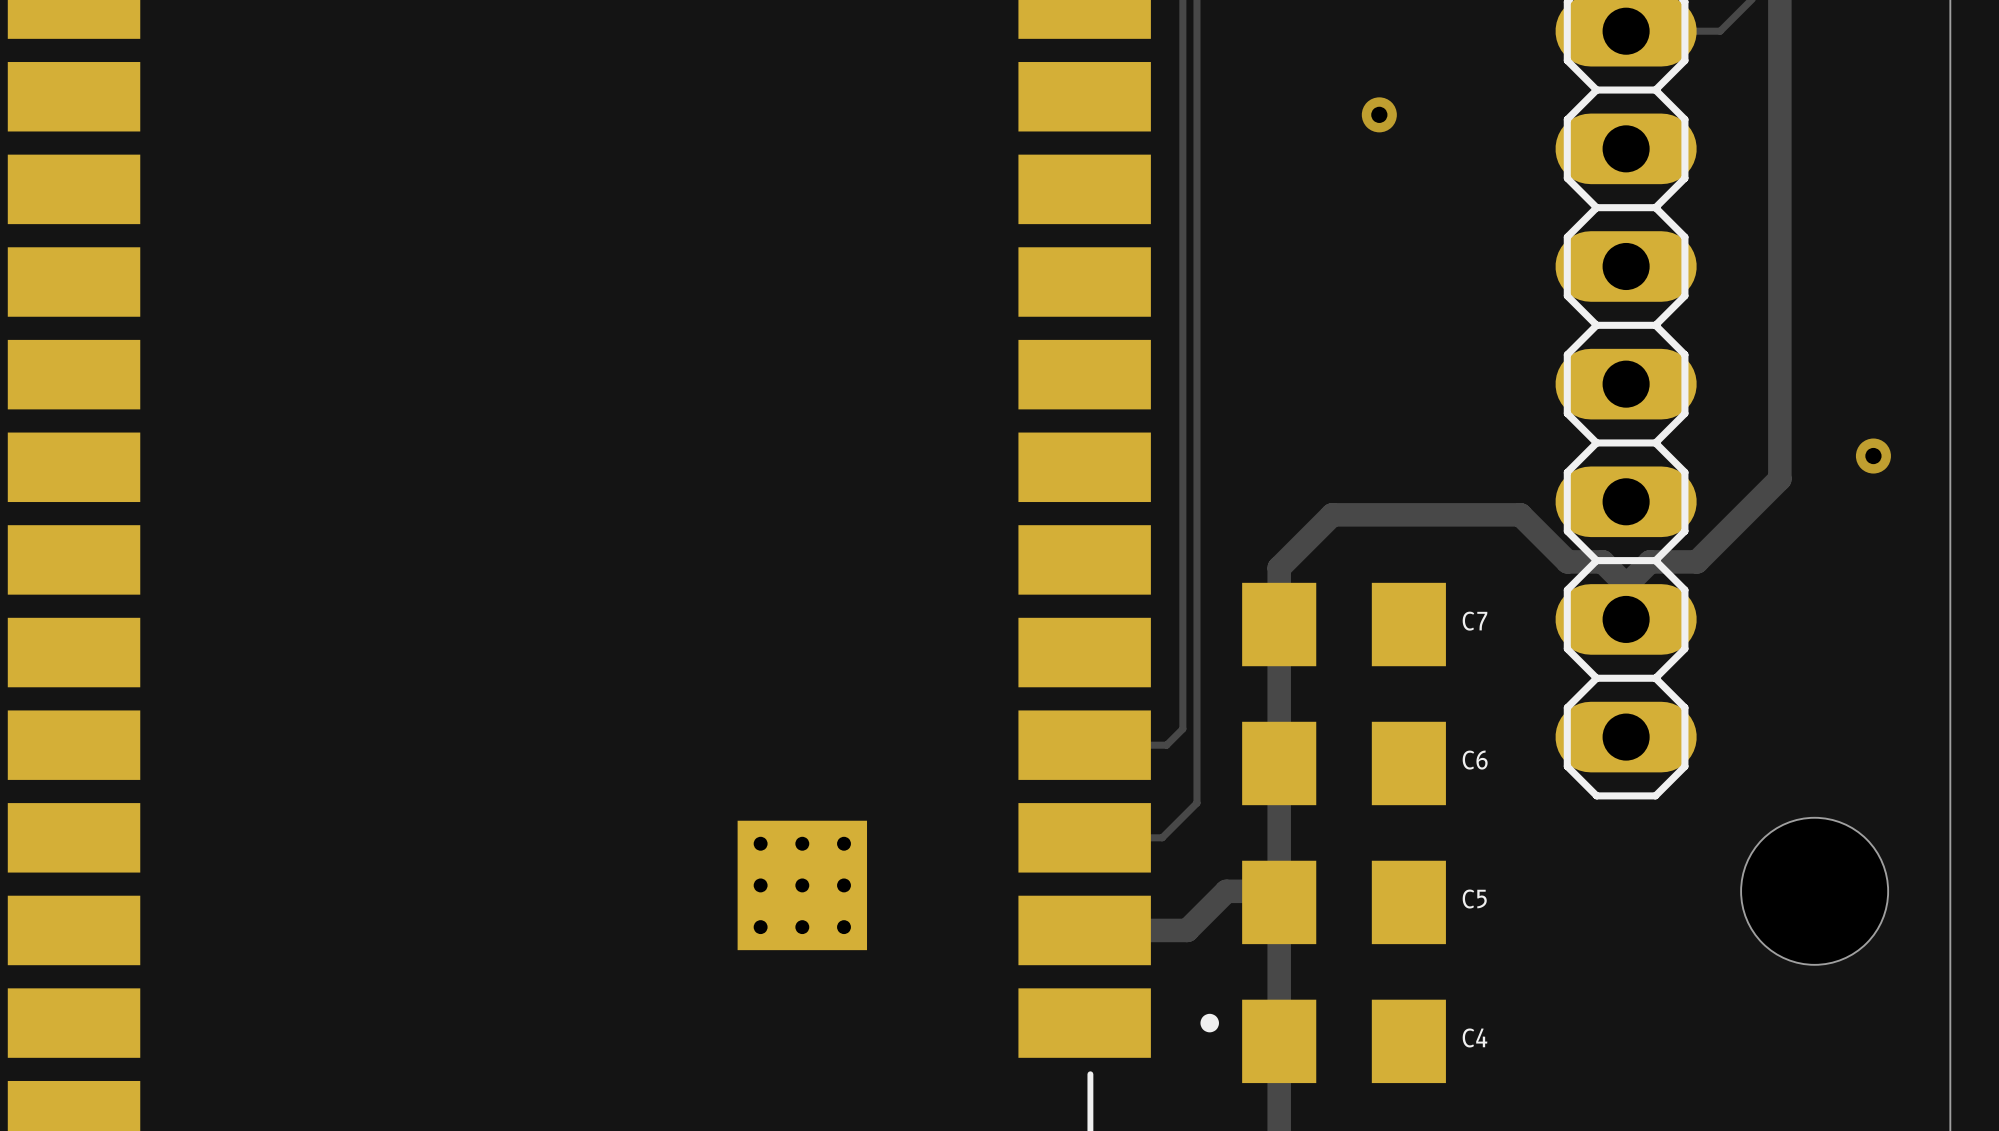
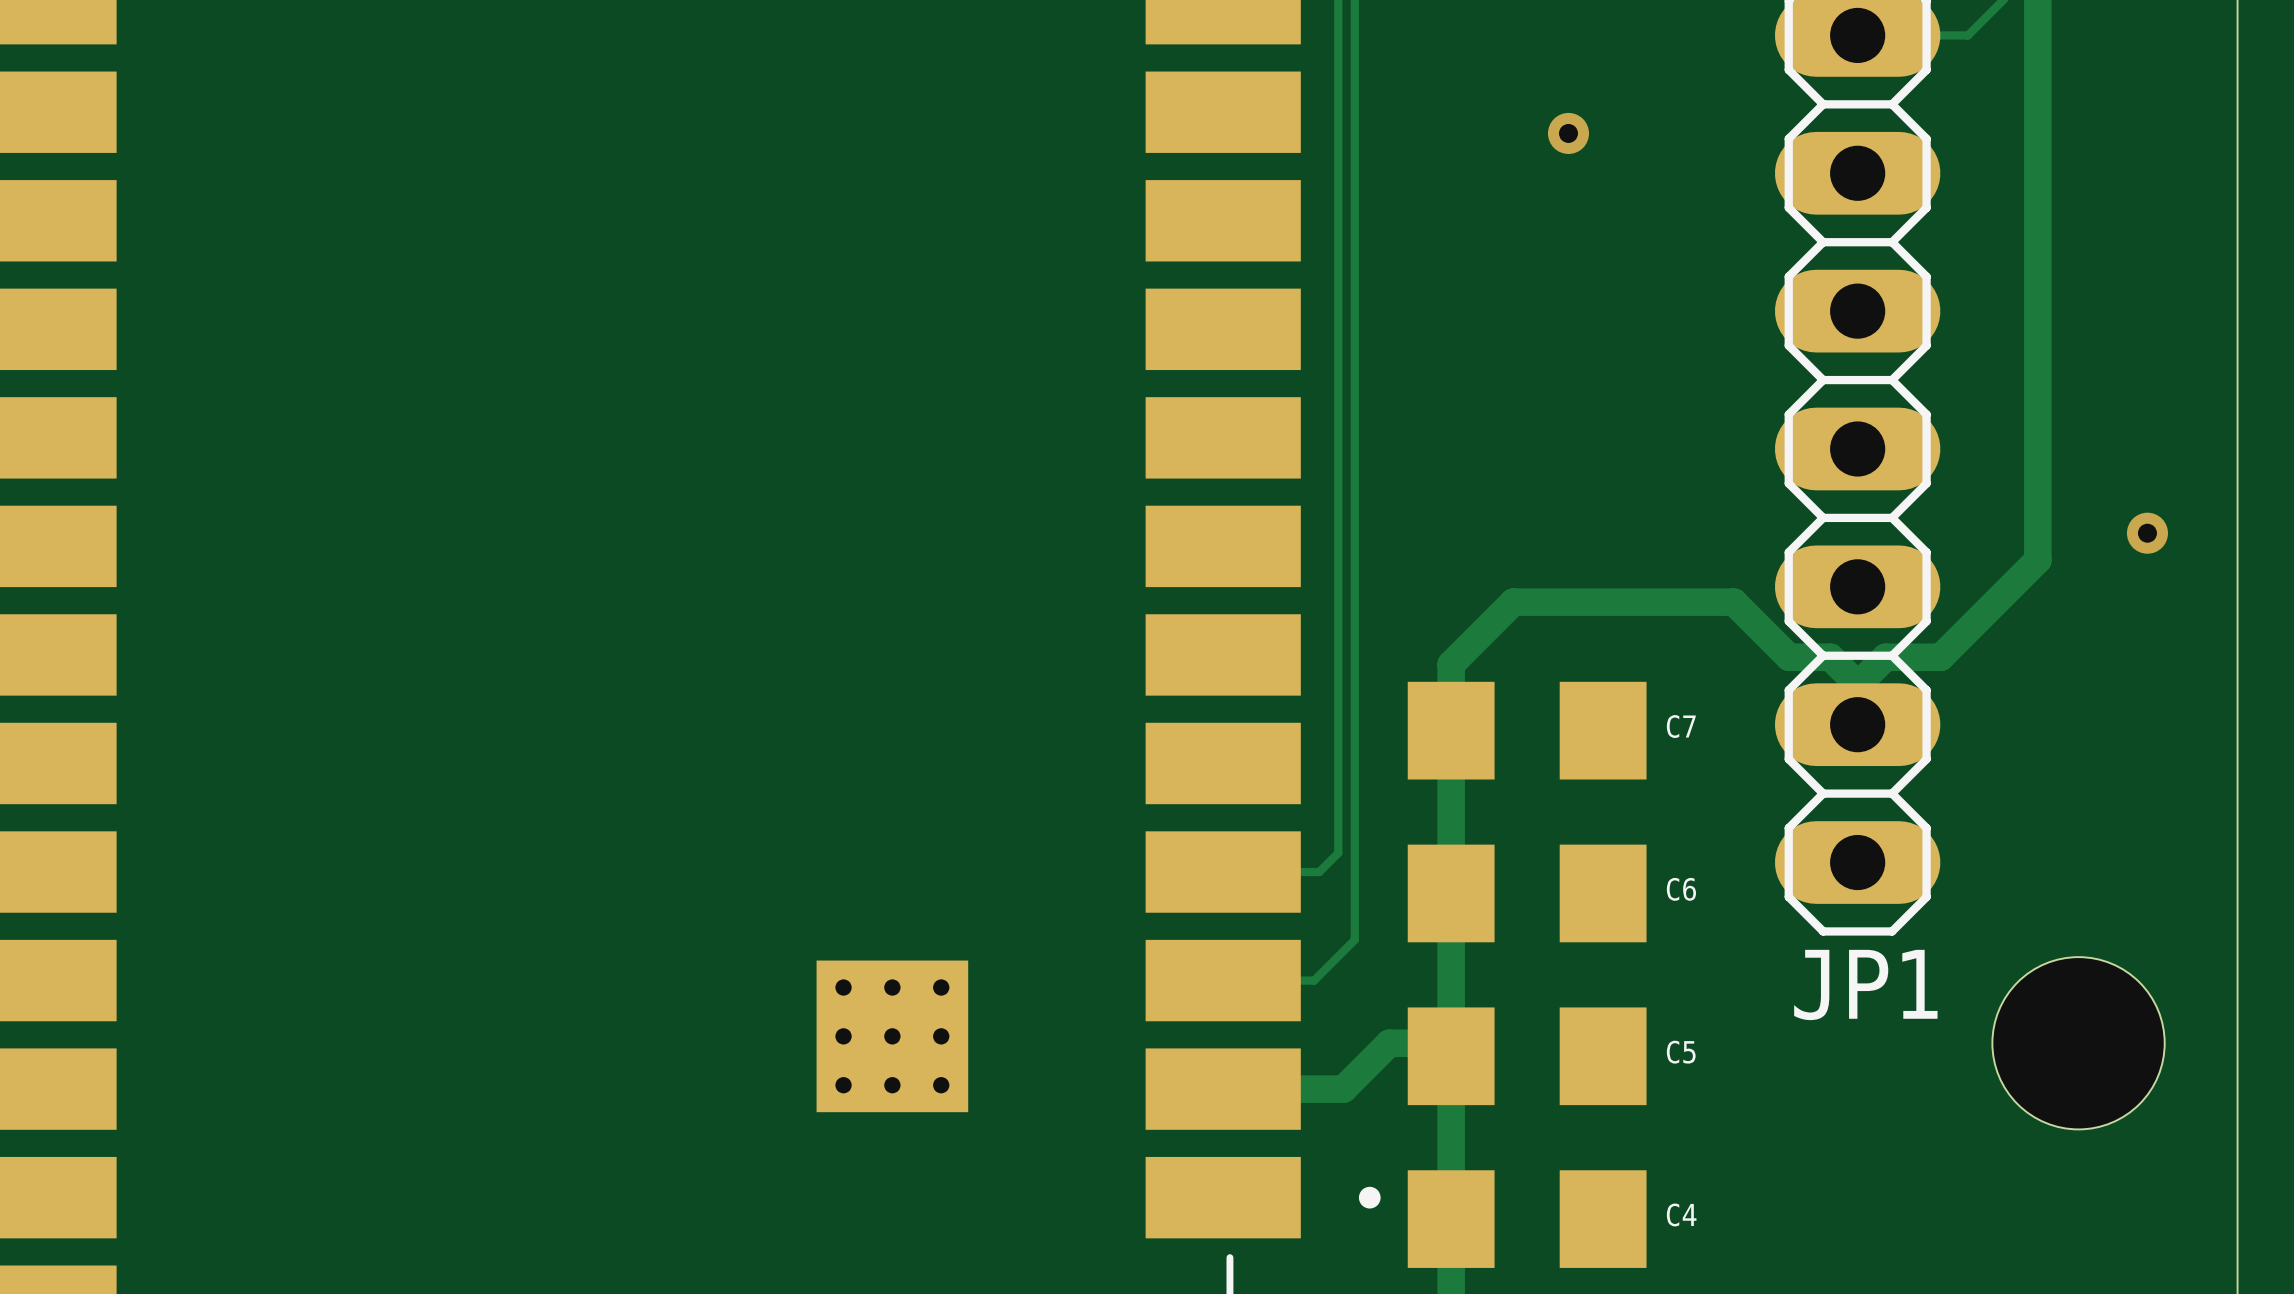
JP1 name: none -> JP1 (1865, 984)

